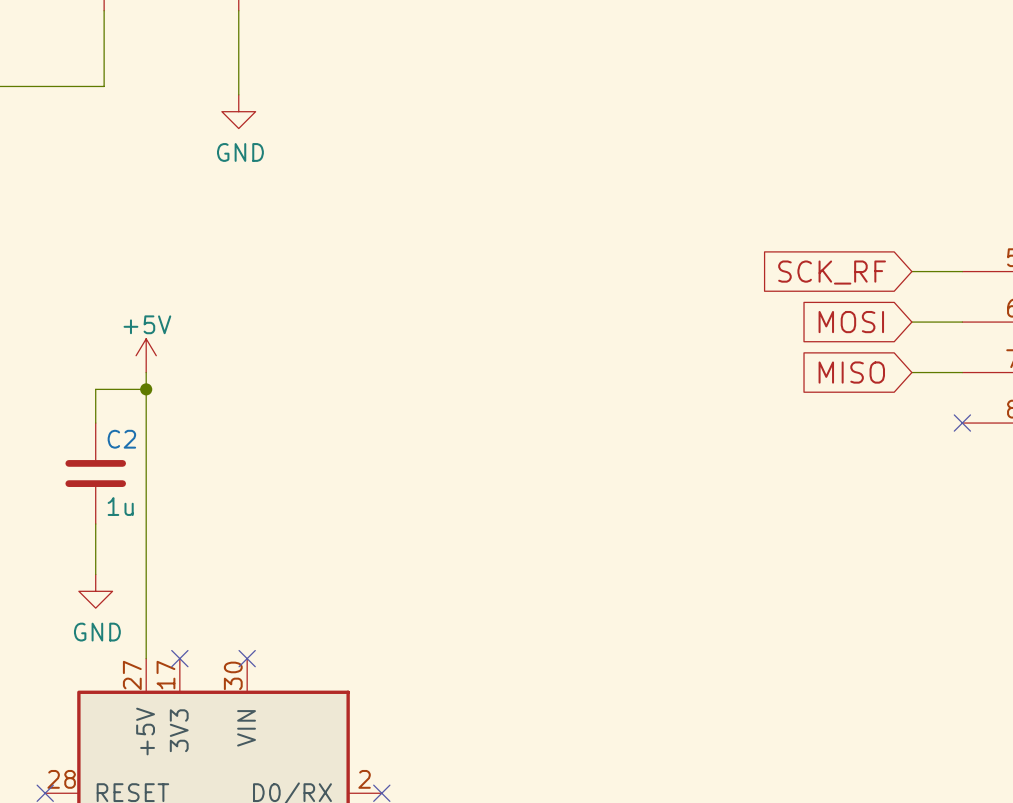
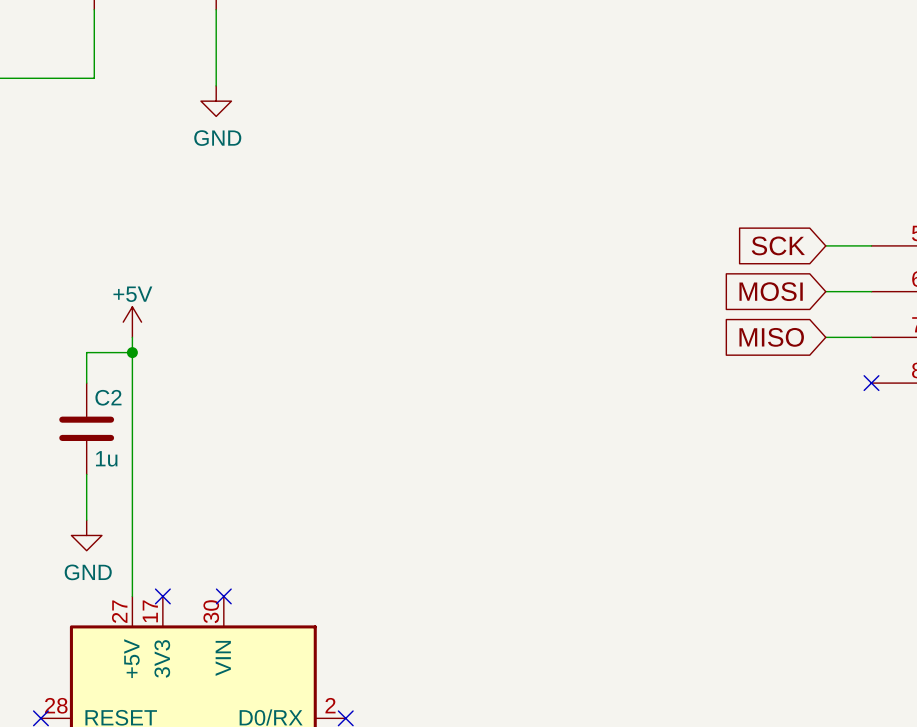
global label: SCK_RF (832, 272) -> SCK (778, 245)

